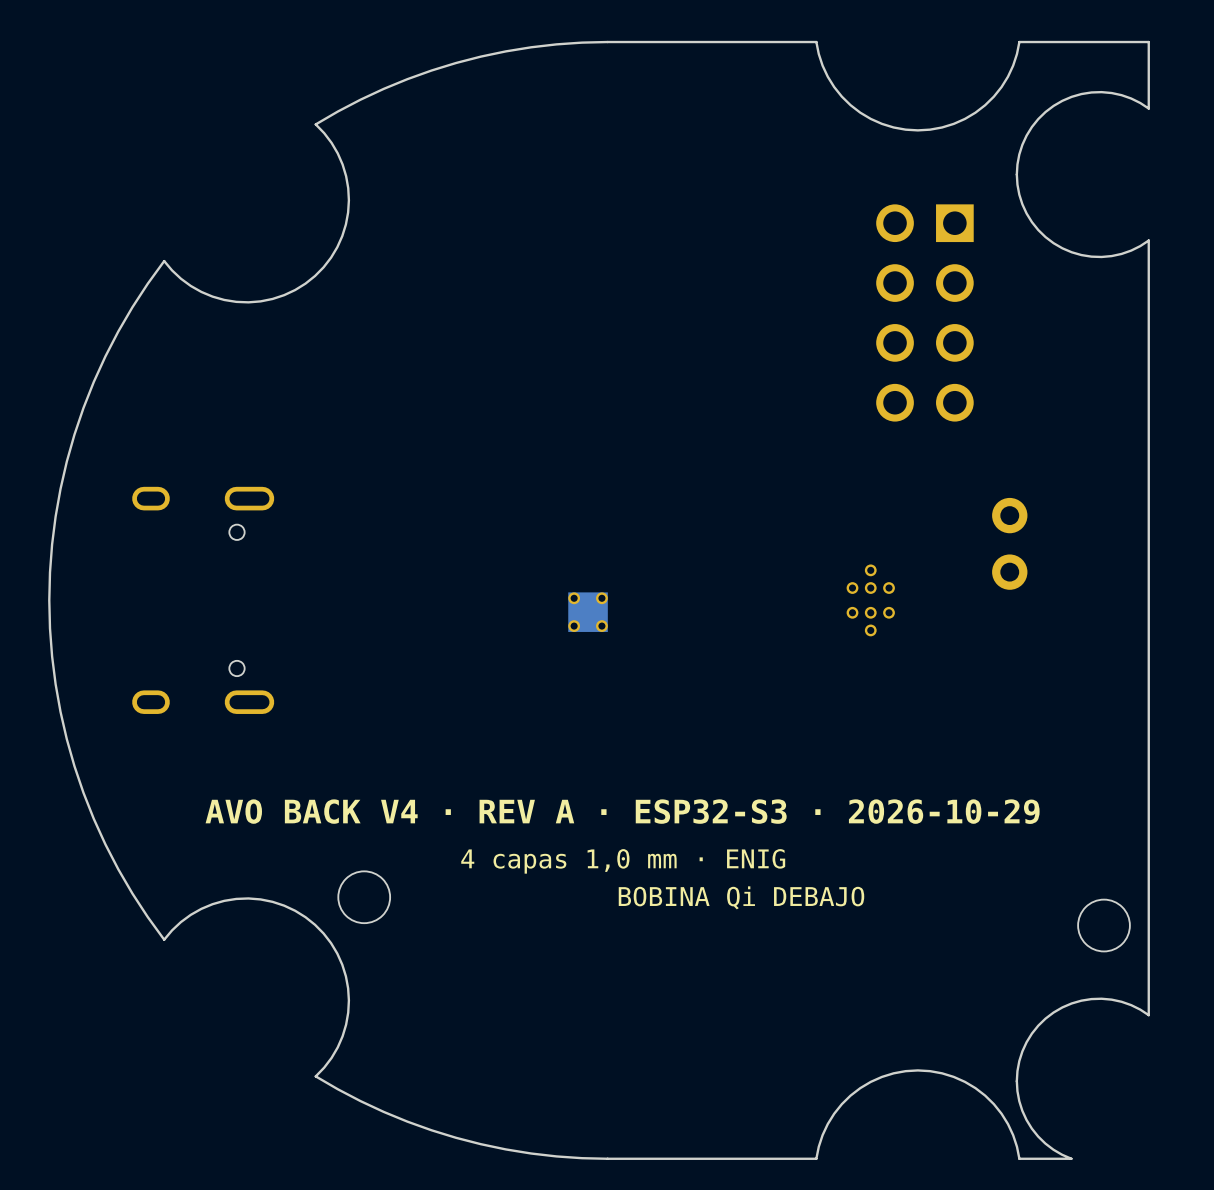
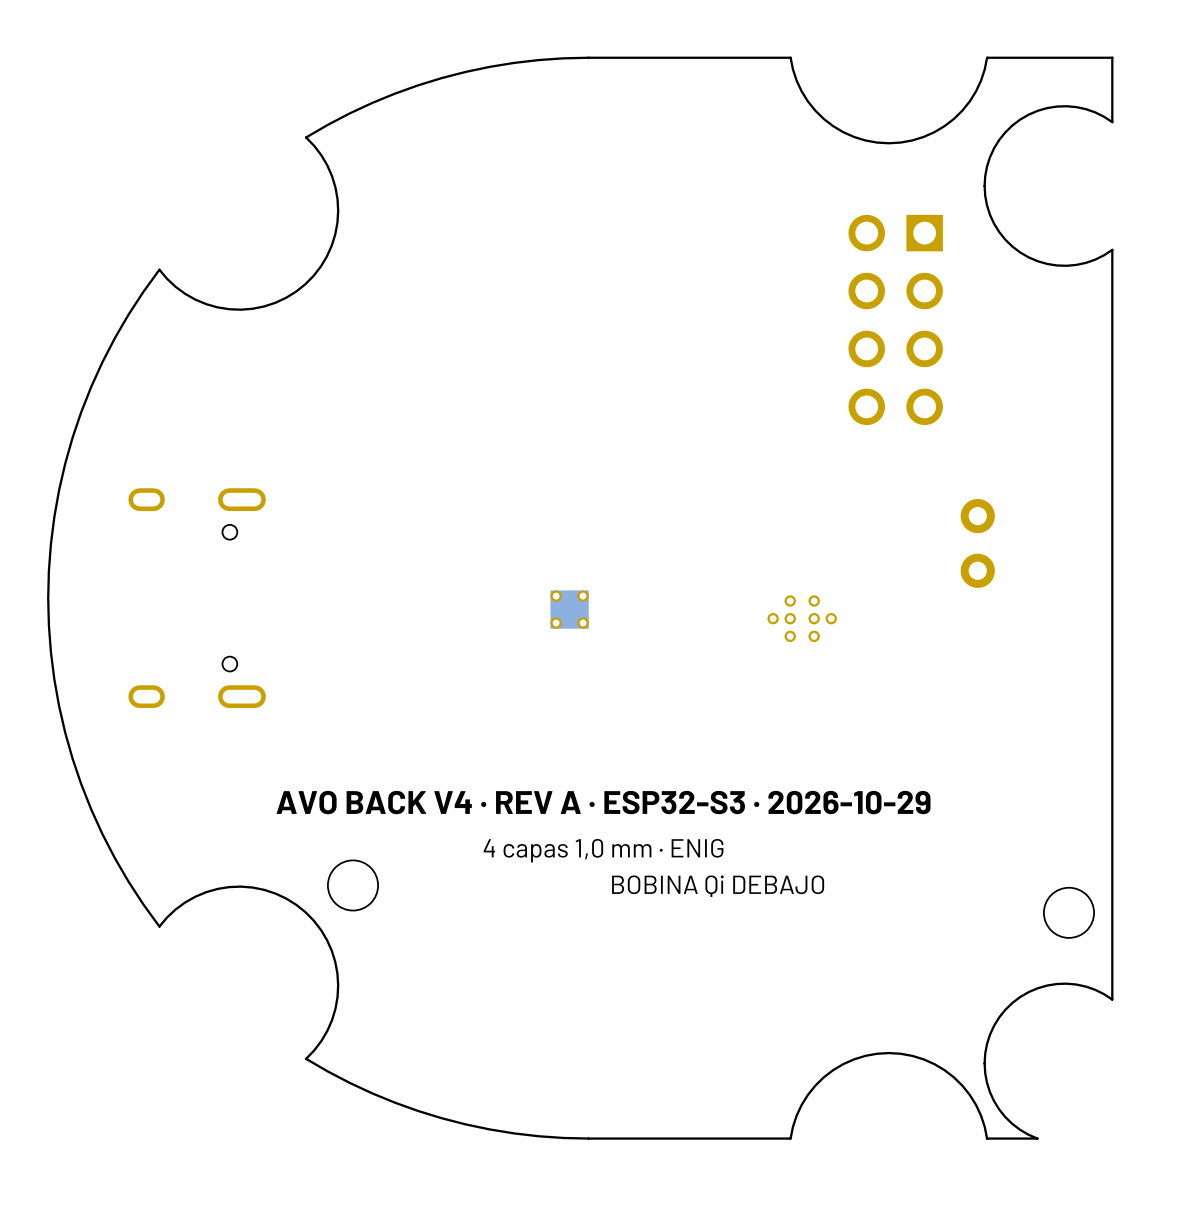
part rotation: 0° (870, 600) -> 90° clockwise (802, 618)
part position: (870, 600) -> (802, 618)

